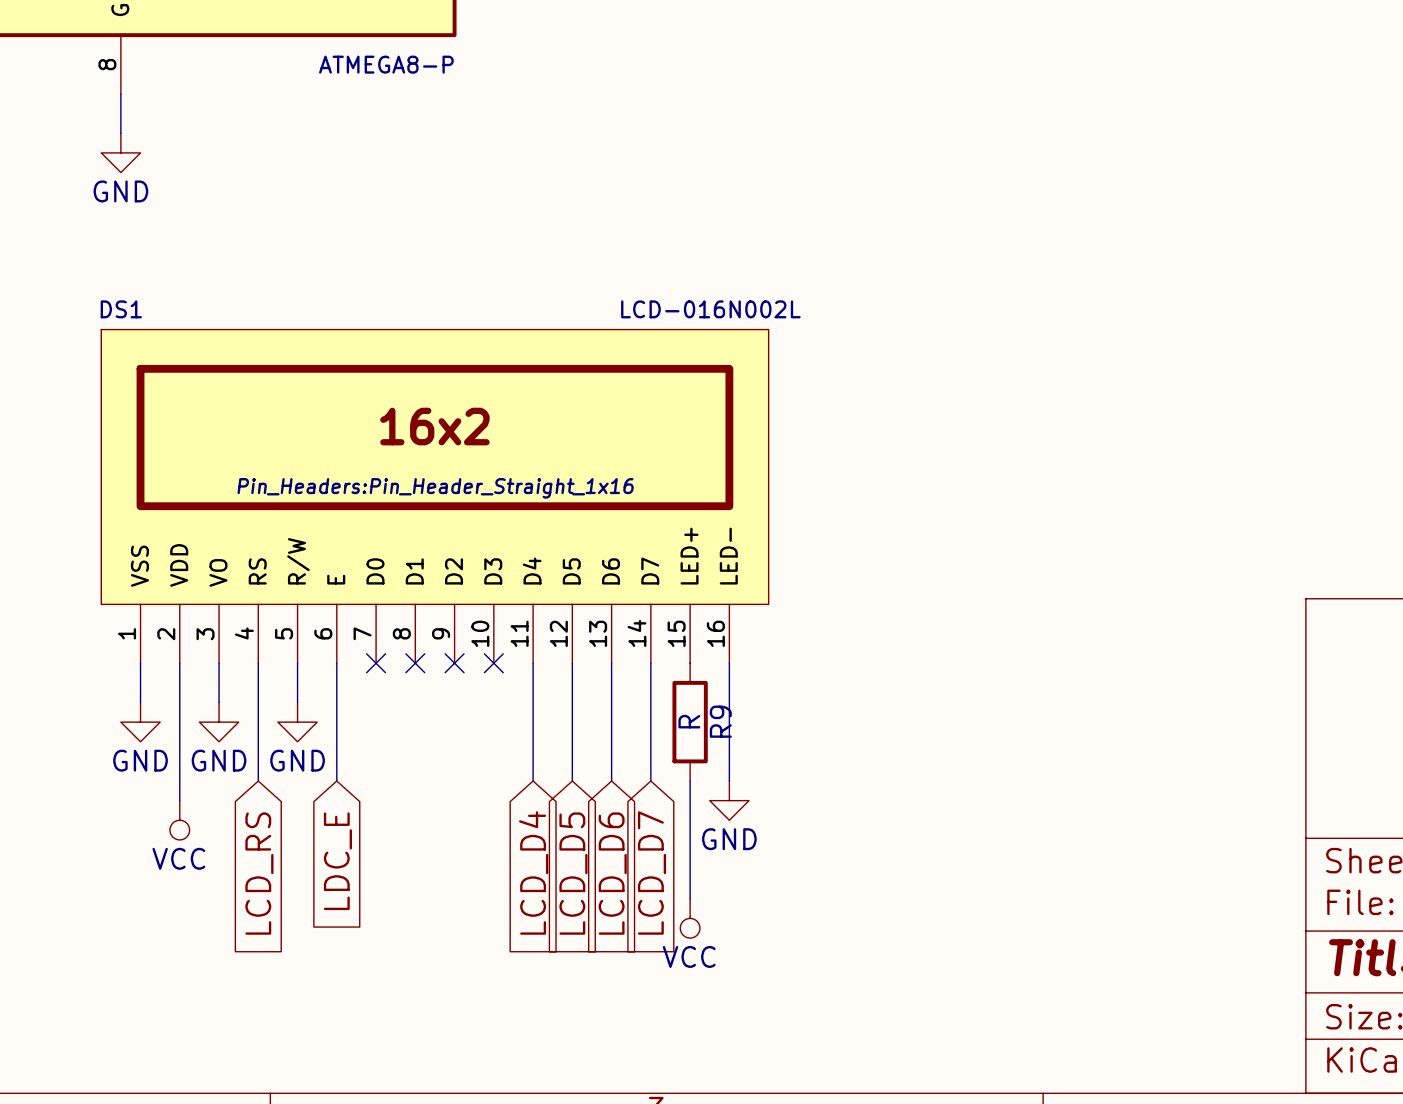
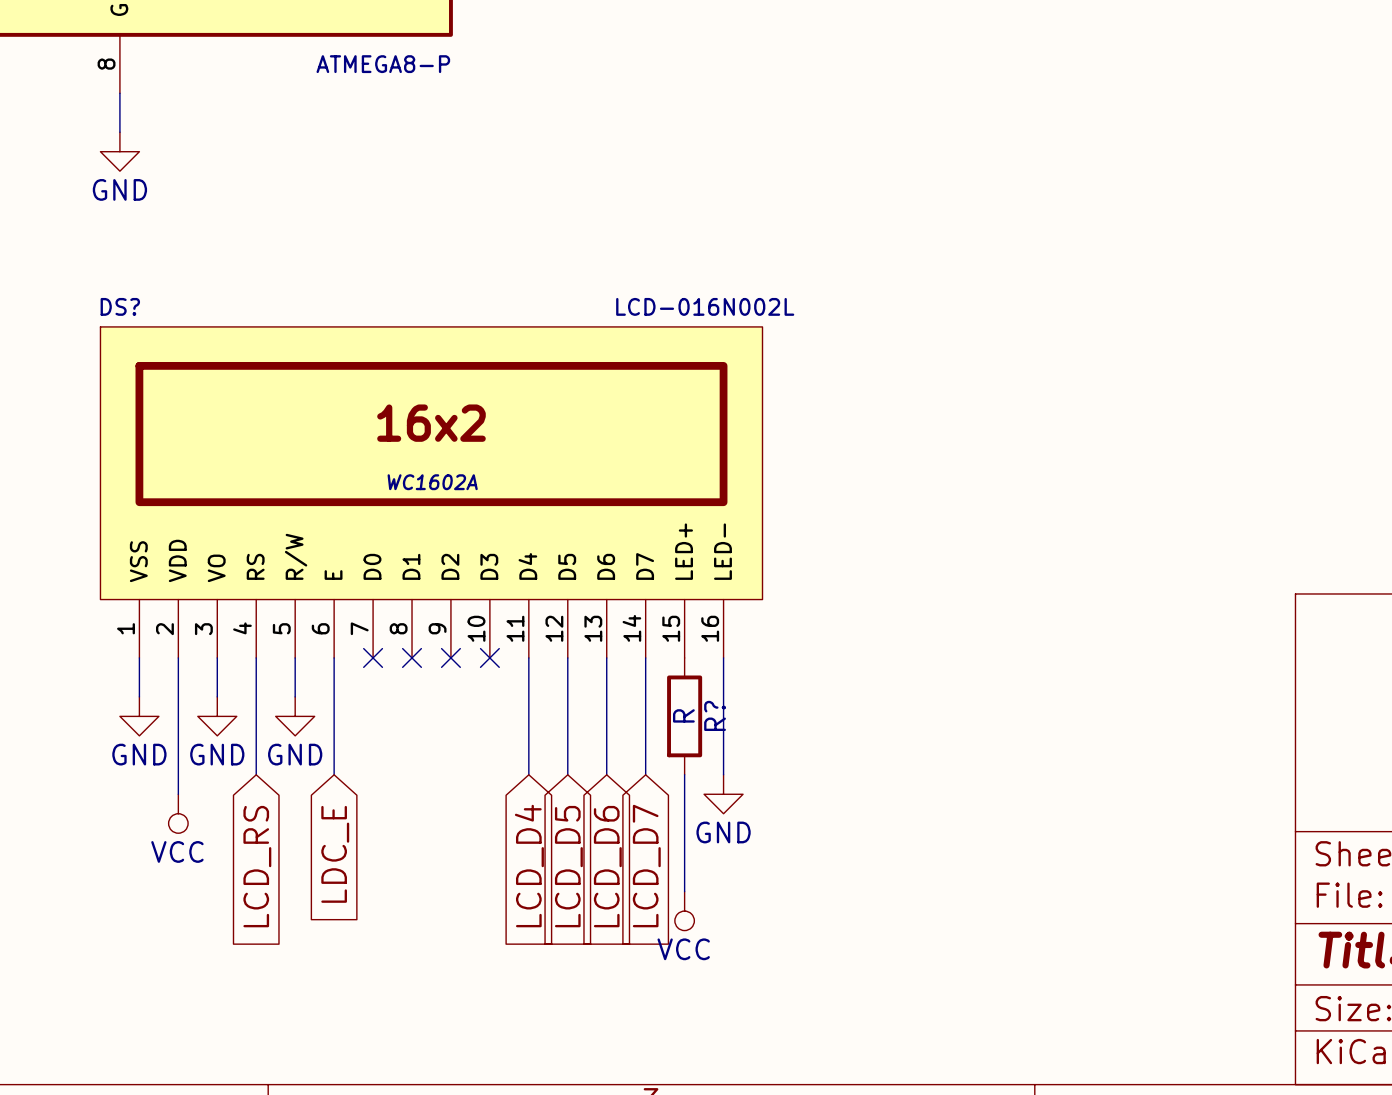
DS1 name: DS1 (121, 309) -> DS? (120, 306)
DS1 text: Pin_Headers:Pin_Header_Straight_1x16 (435, 488) -> WC1602A (432, 482)
R9 name: R9 (720, 721) -> R? (715, 715)

